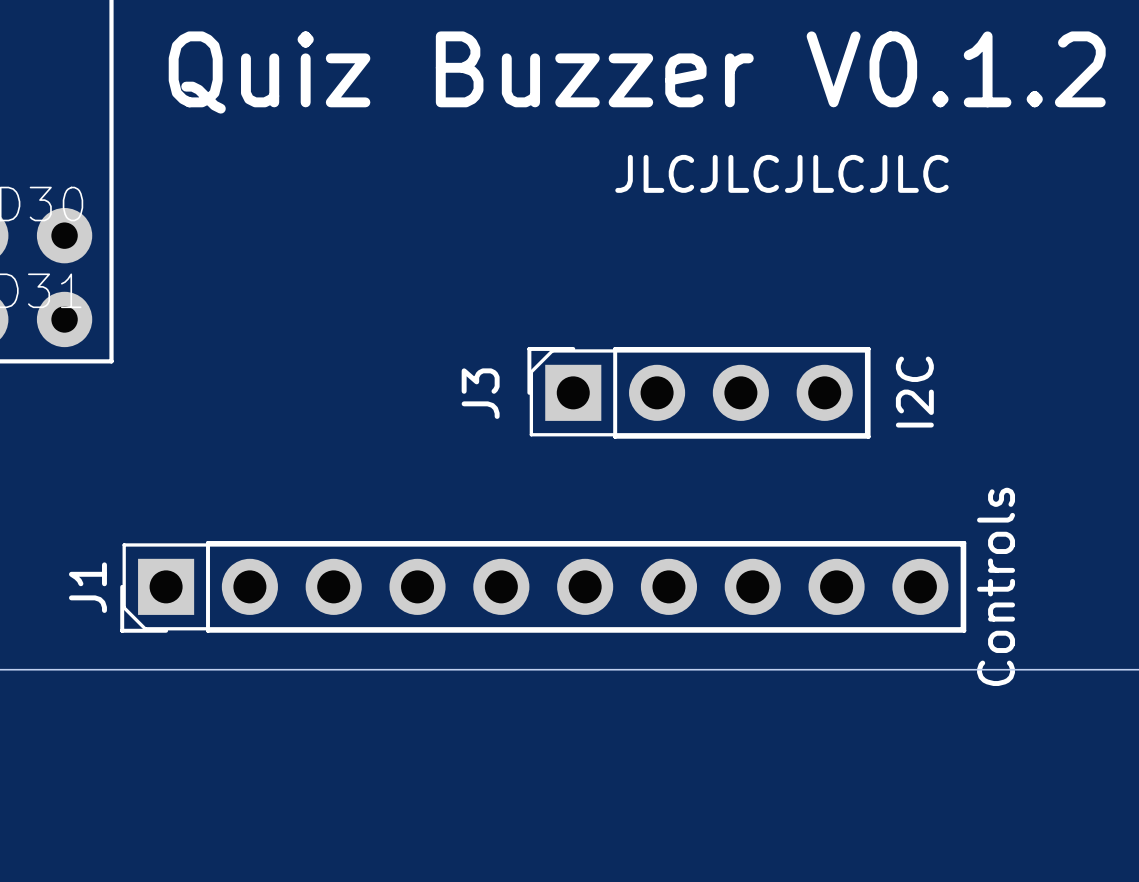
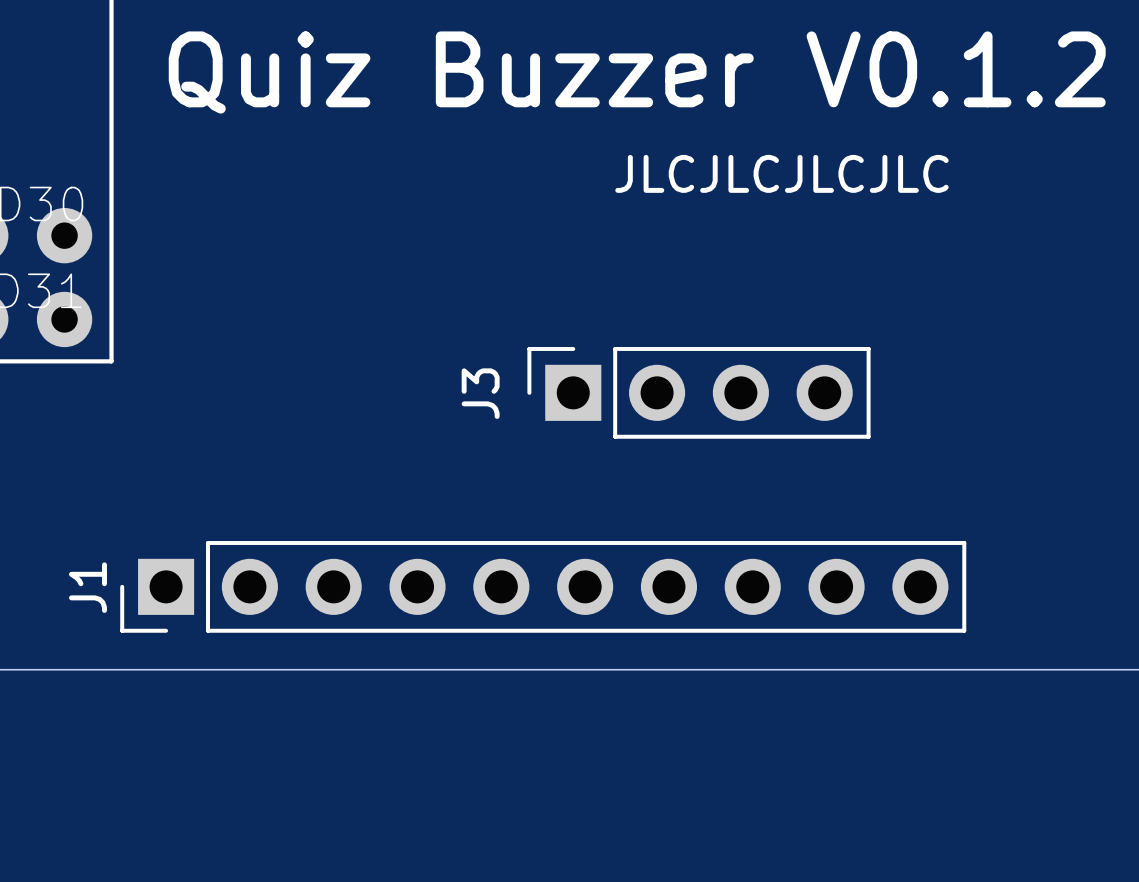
J3 footprint: [527, 346, 871, 439] -> [527, 346, 871, 439]
J3 value: I2C (914, 392) -> none
J1 footprint: [120, 541, 967, 633] -> [120, 541, 967, 633]
J1 value: Controls (996, 586) -> none

